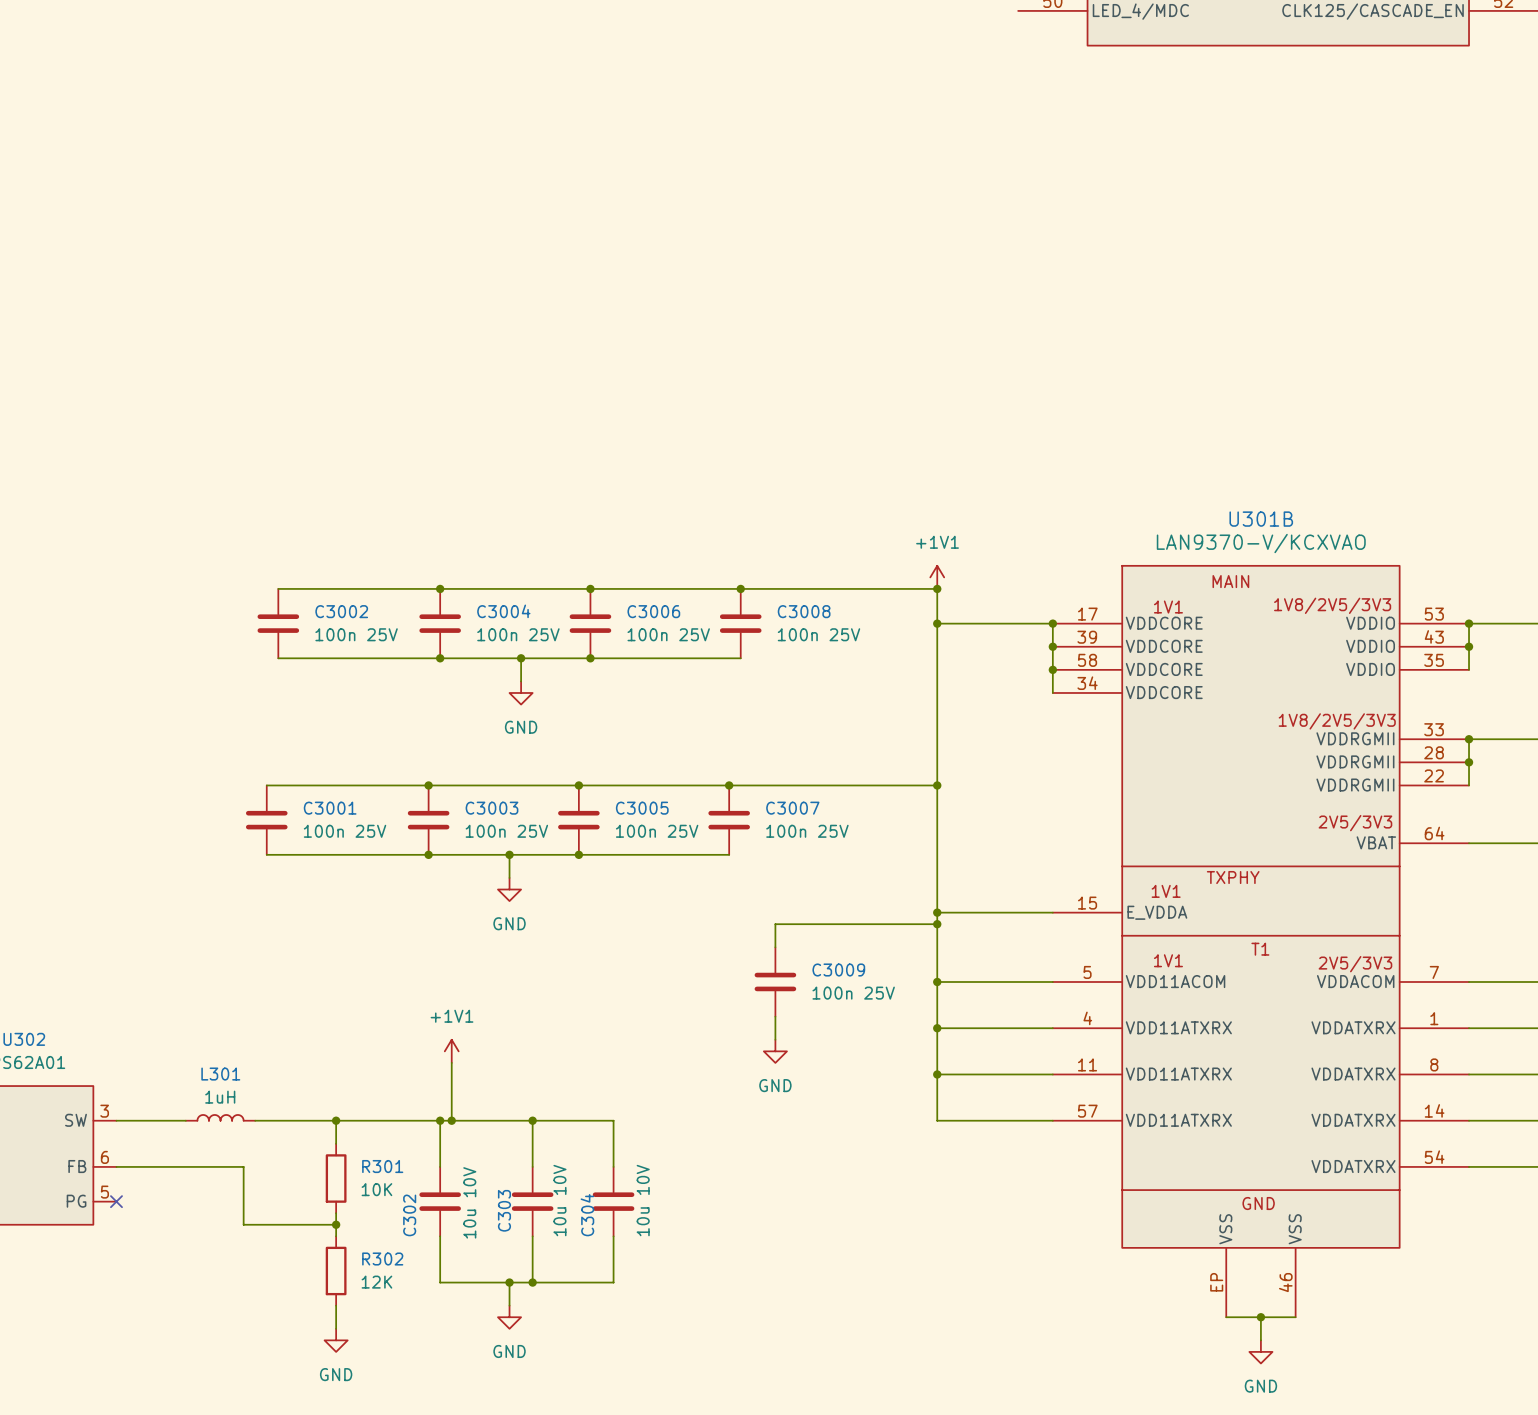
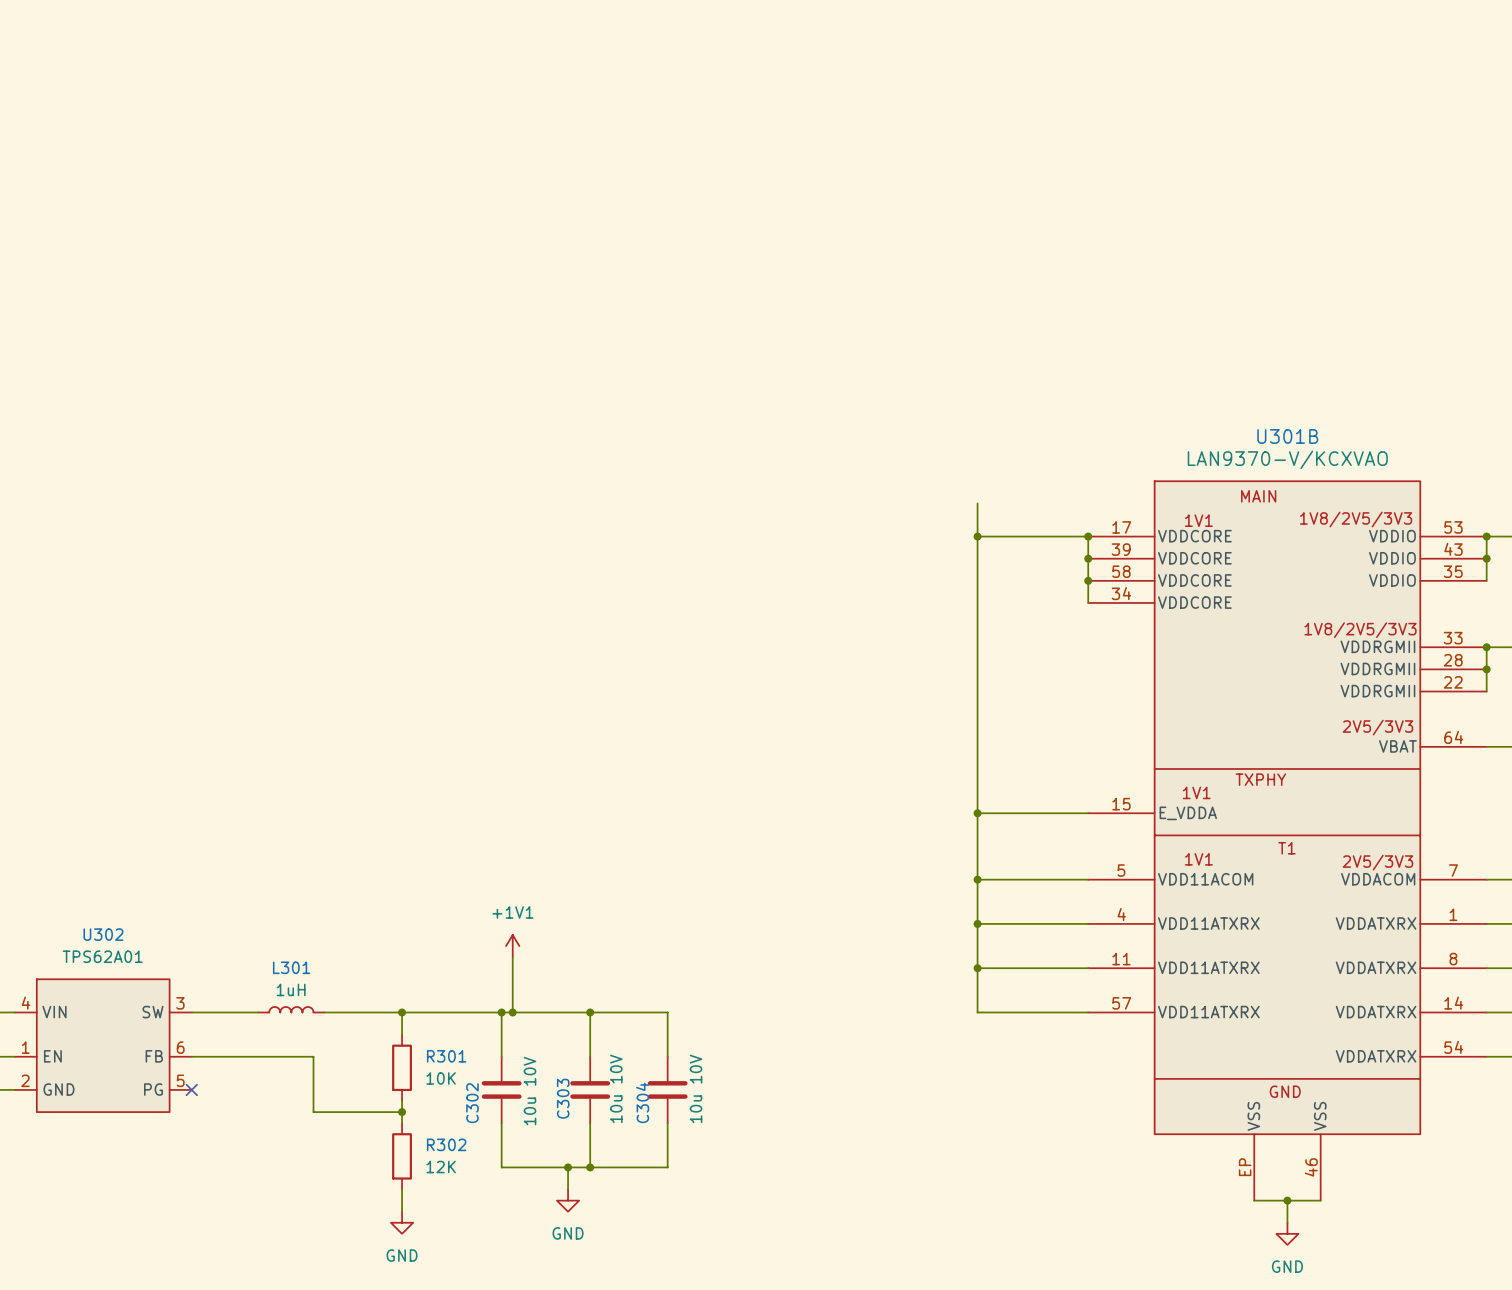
power symbol: +1V1 (937, 577) -> none
wire: (278, 588) (937, 588) -> none
junction: (440, 588) -> none
junction: (590, 588) -> none
junction: (740, 588) -> none
junction: (937, 588) -> none
C3002: 100n 25V (278, 623) -> none
C3004: 100n 25V (440, 623) -> none
C3006: 100n 25V (590, 623) -> none
C3008: 100n 25V (740, 623) -> none
wire: (278, 658) (740, 658) -> none
junction: (440, 658) -> none
wire: (521, 658) (521, 681) -> none
junction: (521, 658) -> none
junction: (590, 658) -> none
power symbol: GND (521, 692) -> none
wire: (266, 785) (937, 785) -> none
junction: (428, 785) -> none
junction: (578, 785) -> none
junction: (729, 785) -> none
junction: (937, 785) -> none
C3001: 100n 25V (266, 820) -> none
C3003: 100n 25V (428, 820) -> none
C3005: 100n 25V (578, 820) -> none
C3007: 100n 25V (729, 820) -> none
wire: (266, 854) (729, 854) -> none
junction: (428, 854) -> none
wire: (509, 854) (509, 877) -> none
junction: (509, 854) -> none
junction: (578, 854) -> none
power symbol: GND (509, 889) -> none
wire: (937, 924) (775, 924) (775, 947) -> none
junction: (937, 924) -> none
C3009: 100n 25V (775, 981) -> none
wire: (775, 1016) (775, 1039) -> none
power symbol: GND (775, 1051) -> none

